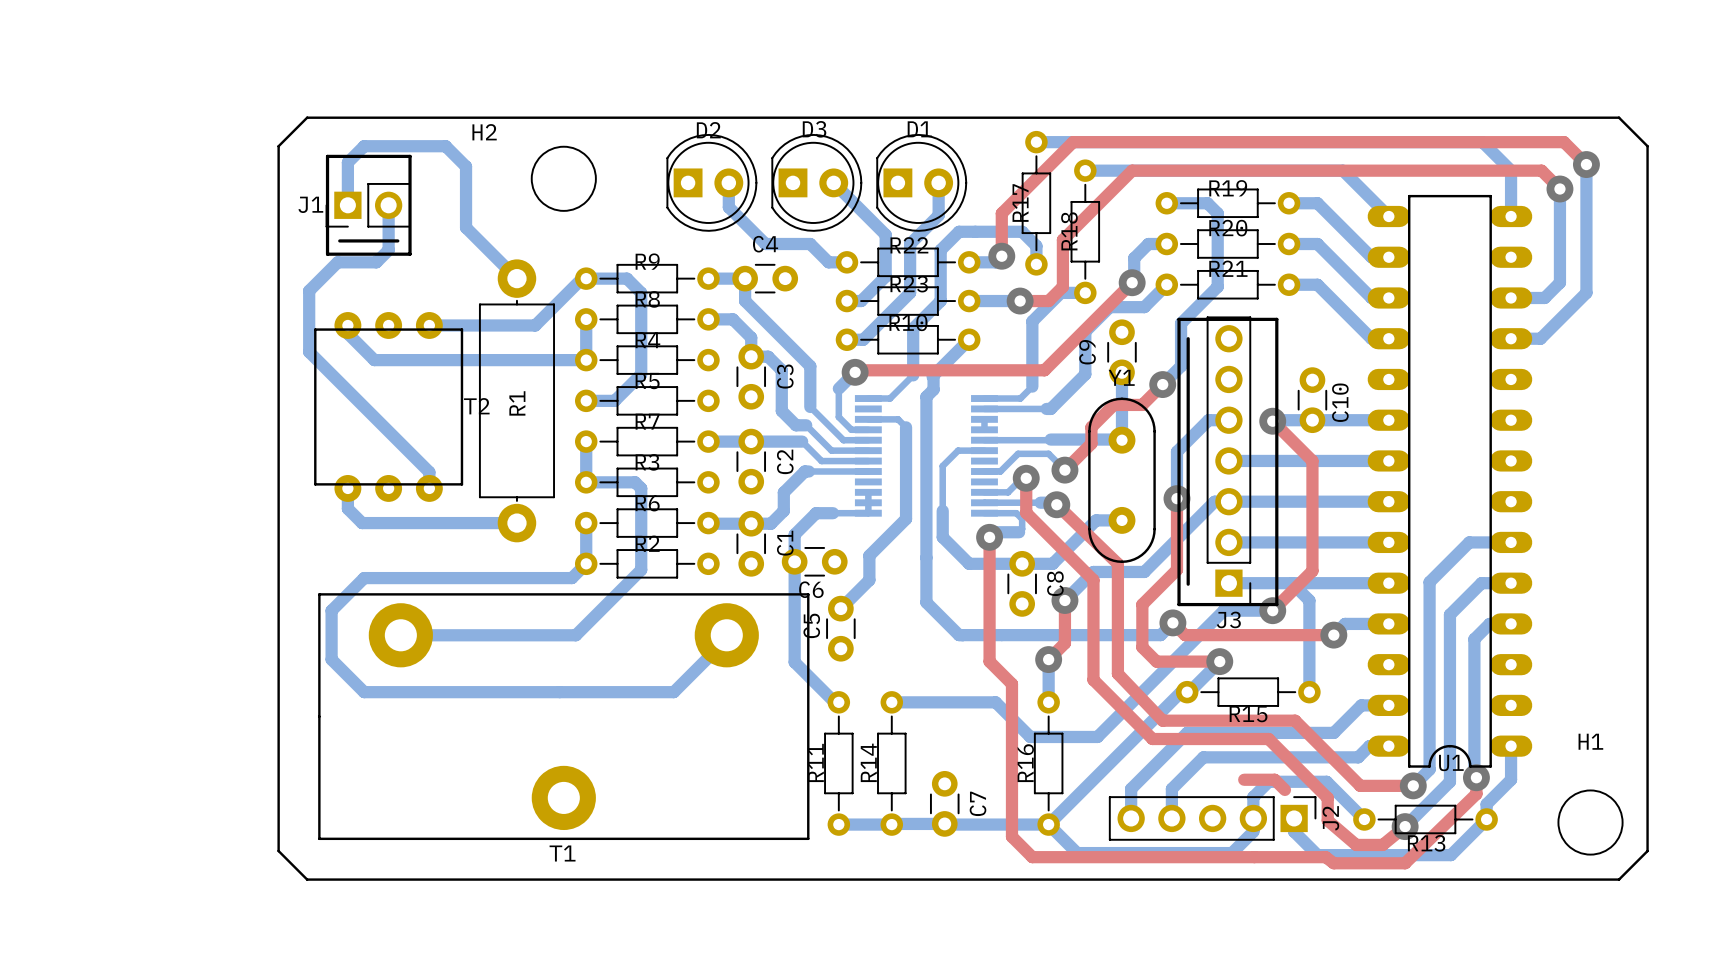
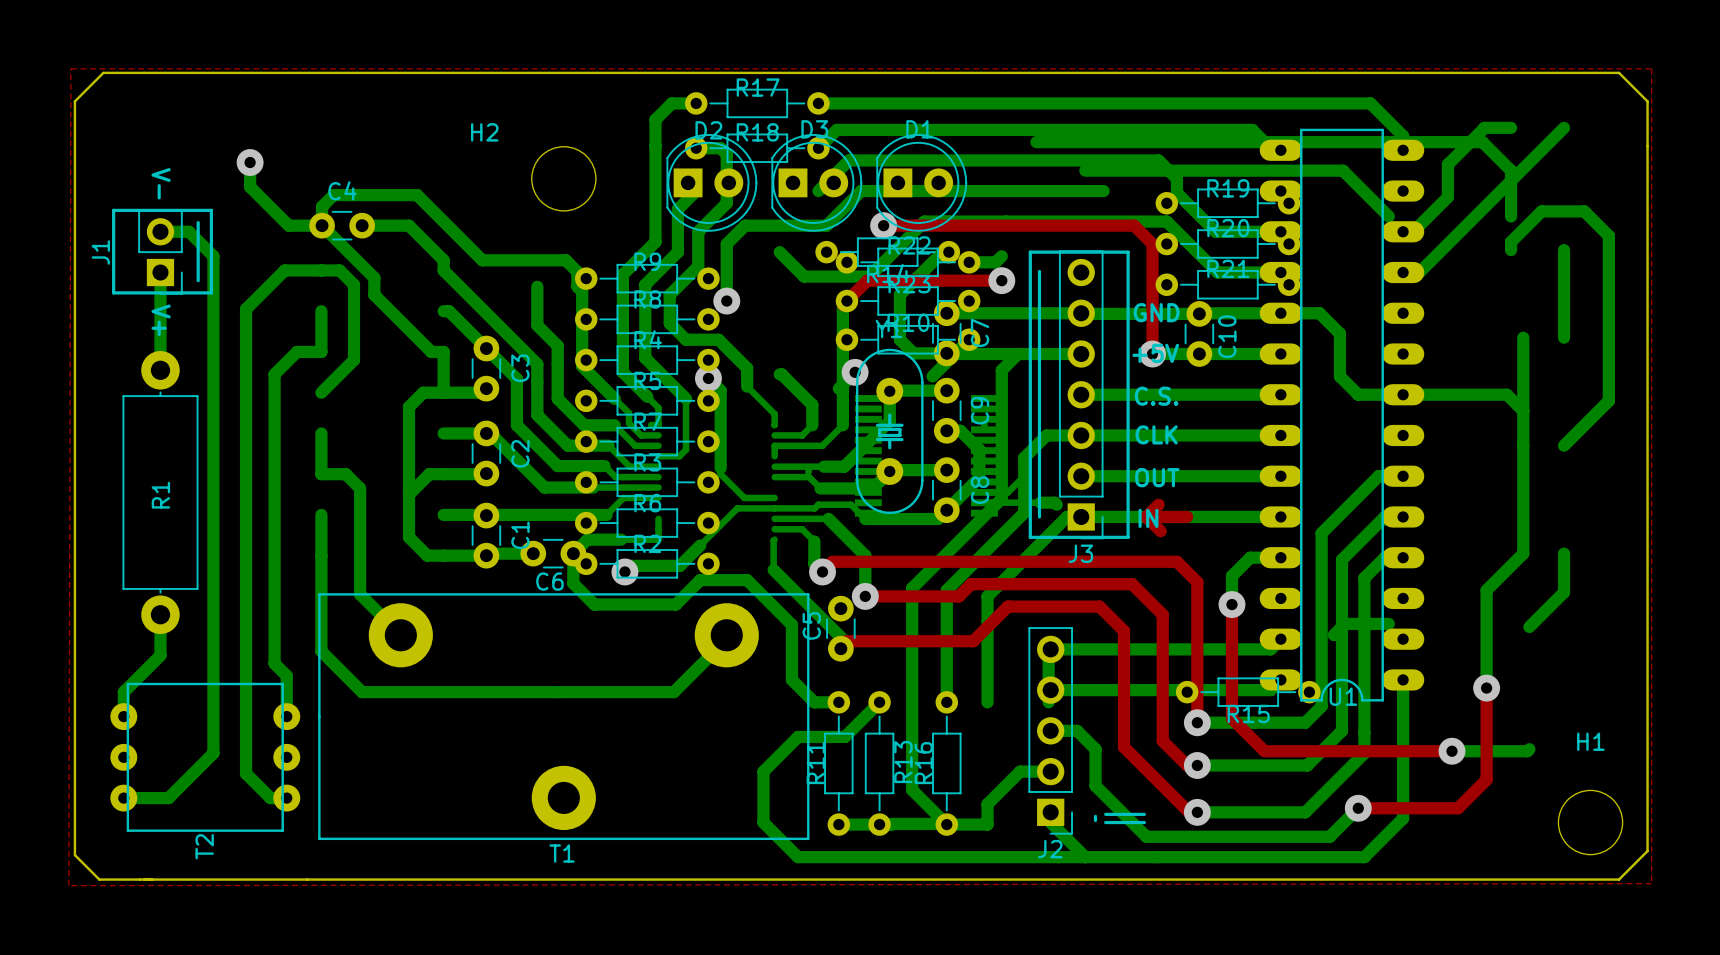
top zone outline: none -> (70, 68) (68, 885) (1651, 883) (1651, 68) (70, 68)
bottom track: none -> (696, 103) (671, 103) (655, 119) (655, 241) (622, 274) (622, 372) (658, 407) (658, 424) (651, 424)
bottom track: none -> (818, 103) (1370, 103) (1403, 136) (1403, 150)
bottom track: none -> (1511, 127) (1484, 127) (1447, 164) (1447, 197) (1413, 231) (1403, 231)
bottom track: none -> (1564, 127) (1419, 272) (1403, 272)
board edge: (1647, 146) (1619, 117) (307, 117) (278, 146) (278, 851) (307, 879) -> (1647, 146) (1647, 101) (1619, 72) (103, 72) (74, 101) (74, 855) (99, 879) (307, 879)
bottom track: none -> (696, 148) (720, 148) (726, 154) (726, 203) (698, 231) (698, 266) (669, 294) (669, 323) (686, 339) (718, 339) (747, 368) (747, 386) (774, 414) (774, 425)
bottom track: none -> (818, 148) (836, 129) (1252, 129) (1272, 150) (1280, 150)
line: (327, 156) (410, 156) (410, 254) (327, 254) (327, 156) -> none
bottom track: none -> (250, 162) (250, 186) (288, 225) (322, 225)
via: none -> (250, 162)
top track: (1586, 164) (1564, 142) (1073, 142) (1001, 213) (1001, 256) -> none
bottom track: (1586, 164) (1586, 292) (1540, 338) (1511, 338) -> none
via: (1586, 164) -> none
bottom track: (728, 182) (728, 207) (765, 244) (810, 244) (828, 262) (846, 262) -> none
bottom track: (833, 182) (885, 234) (885, 276) (861, 301) (846, 301) -> none
bottom track: (938, 182) (938, 215) (910, 244) (910, 292) (863, 339) (846, 339) -> none
text: none -> V- (161, 183)
top track: (1559, 189) (1541, 170) (1132, 170) (1062, 239) (1062, 286) (1048, 301) (1020, 301) -> none
bottom track: (1559, 189) (1559, 282) (1544, 297) (1511, 297) -> none
via: (1559, 189) -> none
bottom track: none -> (696, 191) (677, 209) (677, 252) (645, 284) (645, 358) (686, 398) (686, 449) (679, 456) (658, 456)
bottom track: none -> (818, 191) (849, 160) (1158, 160) (1176, 178) (1176, 193) (1215, 231) (1280, 231)
bottom track: none -> (1103, 191) (861, 191) (826, 225) (745, 225) (726, 244) (726, 301)
R17 rotation: 0° (1036, 203) -> 90° clockwise (757, 103)
R17 position: (1036, 203) -> (757, 103)
bottom track: (1166, 203) (1207, 203) (1217, 213) (1217, 286) (1181, 323) (1181, 366) (1162, 384) -> none
bottom track: (1289, 203) (1317, 203) (1371, 257) (1388, 257) -> none
bottom track: (347, 205) (347, 162) (364, 146) (445, 146) (466, 166) (466, 227) (516, 278) -> none
J1 rotation: 0° (368, 205) -> 90° counterclockwise (160, 252)
J1 position: (368, 205) -> (160, 252)
bottom track: (388, 205) (388, 250) (376, 262) (337, 262) (309, 290) (309, 351) (429, 472) (429, 488) -> none
line: none -> (113, 210) (211, 210) (211, 292) (113, 292) (113, 210)
line: none -> (198, 222) (198, 280)
bottom track: none -> (322, 225) (322, 206) (333, 195) (417, 195) (482, 260) (565, 260) (577, 271) (577, 286) (582, 291) (582, 366) (629, 413) (629, 423) (641, 435) (658, 435)
bottom track: none -> (322, 225) (374, 277) (374, 294) (431, 351) (443, 351) (443, 392)
bottom track: none -> (362, 225) (409, 225) (443, 260) (443, 270) (537, 364) (537, 415) (567, 445) (608, 445) (629, 466) (658, 466)
top track: none -> (883, 225) (1134, 225) (1152, 244) (1152, 354)
via: none -> (883, 225)
bottom track: none -> (160, 231) (189, 231) (213, 256) (213, 753) (168, 798) (123, 798)
R18 rotation: 0° (1085, 231) -> 90° clockwise (757, 148)
R18 position: (1085, 231) -> (757, 148)
line: (339, 240) (397, 240) -> none
bottom track: (1166, 244) (1148, 244) (1134, 258) (1134, 280) (1132, 282) -> none
bottom track: (1289, 244) (1317, 244) (1371, 297) (1388, 297) -> none
bottom track: none -> (1511, 250) (1511, 241) (1541, 211) (1584, 211) (1608, 235) (1608, 400) (1564, 445)
bottom track: none -> (1564, 250) (1564, 337)
bottom track: none -> (779, 252) (804, 276) (869, 276) (924, 221) (1166, 221) (1217, 272) (1280, 272)
bottom track: none -> (948, 252) (942, 252) (899, 294) (899, 339) (913, 353) (1081, 354)
via: (1001, 256) -> none
bottom track: (1036, 264) (1036, 246) (1022, 231) (959, 231) (940, 250) (940, 301) (913, 328) (913, 375) -> none
bottom track: none -> (160, 272) (160, 370)
bottom track: (708, 278) (745, 278) (745, 301) (810, 366) (810, 406) (843, 440) (868, 440) -> none
C4 position: (765, 278) -> (342, 225)
top track: none -> (1001, 280) (867, 280) (842, 305)
via: none -> (1001, 280)
top track: (1132, 282) (1044, 370) (857, 370) (855, 372) -> none
via: (1132, 282) -> none
bottom track: (1166, 284) (1144, 307) (1109, 307) (1085, 331) (1085, 374) (1050, 408) (984, 408) -> none
bottom track: (1289, 284) (1317, 284) (1371, 338) (1388, 338) -> none
bottom track: none -> (537, 286) (537, 325) (557, 345) (557, 398) (584, 425) (614, 425) (635, 445) (658, 445)
bottom track: (1085, 292) (1060, 292) (1032, 321) (1032, 386) (1020, 398) (984, 398) -> none
via: none -> (726, 301)
bottom track: (969, 301) (1020, 301) -> none
via: (1020, 301) -> none
bottom track: none -> (842, 305) (842, 425) (822, 445) (774, 445) (774, 456)
bottom track: none -> (321, 311) (321, 351) (296, 351) (274, 374) (274, 663) (286, 675) (286, 716)
bottom track: none -> (443, 311) (449, 311) (516, 379) (516, 425) (557, 466) (604, 466) (615, 477) (658, 477)
text: none -> GND (1156, 312)
bottom track: none -> (946, 313) (1319, 313) (1339, 333) (1339, 376) (1358, 394) (1506, 394) (1523, 411)
bottom track: (586, 319) (586, 360) (374, 360) (347, 333) (347, 325) -> none
bottom track: (708, 319) (732, 319) (751, 337) (751, 356) (768, 356) (781, 370) (781, 411) (796, 425) (806, 425) (831, 450) (868, 450) -> none
line: (1179, 319) (1276, 319) (1276, 604) (1179, 604) (1179, 319) -> (1030, 252) (1128, 252) (1128, 537) (1030, 537) (1030, 252)
text: none -> V+ (161, 320)
bottom track: (429, 325) (535, 325) (582, 278) (626, 278) (641, 292) (641, 374) (614, 400) (586, 400) -> none
bottom track: none -> (1523, 337) (1523, 553) (1486, 590) (1486, 688)
line: (1188, 338) (1188, 584) -> (1039, 271) (1039, 516)
C9 name position: C9 (1087, 352) -> C9 (980, 410)
C9 position: (1121, 352) -> (946, 410)
text: none -> +5V (1155, 353)
bottom track: none -> (1018, 354) (1001, 370) (1001, 498) (912, 588) (912, 789) (946, 824)
bottom track: none -> (1152, 354) (1280, 354)
bottom track: (1121, 372) (1121, 440) (984, 440) -> none
bottom track: none -> (779, 374) (812, 404) (812, 425) (802, 435) (774, 435)
bottom track: (914, 374) (890, 398) (868, 398) -> none
bottom track: (933, 375) (933, 389) (926, 396) (926, 602) (959, 635) (1160, 635) (1172, 622) -> none
C3 position: (751, 376) -> (486, 368)
bottom track: none -> (708, 378) (720, 390) (720, 474) (744, 497) (774, 497)
via: none -> (708, 378)
top track: (1162, 384) (1142, 404) (1113, 404) (1091, 427) (1091, 443) (1064, 470) -> none
via position: (1162, 384) -> (1152, 354)
bottom track: (838, 386) (838, 417) (851, 429) (868, 429) -> none
bottom track: none -> (486, 388) (482, 392) (423, 392) (409, 406) (409, 537) (427, 555) (533, 553)
bottom track: none -> (946, 390) (890, 390) (889, 421) (844, 466) (774, 466)
bottom track: none -> (321, 392) (354, 360) (354, 284) (339, 270) (284, 270) (246, 309) (246, 773) (270, 798) (286, 798)
bottom track: none -> (1081, 394) (1280, 394)
text: none -> C.S. (1156, 396)
R1 position: (516, 400) -> (160, 492)
C10 position: (1312, 400) -> (1199, 333)
T2 rotation: 0° (388, 406) -> 90° clockwise (205, 757)
T2 position: (388, 406) -> (205, 757)
line: none -> (889, 415) (889, 425)
bottom track: (868, 419) (898, 419) (906, 427) (906, 519) (869, 555) (869, 580) (840, 608) -> none
bottom track: (1228, 420) (1208, 420) (1176, 451) (1176, 498) -> none
bottom track: (1388, 420) (1272, 421) -> none
top track: (1272, 421) (1312, 460) (1312, 570) (1272, 610) -> none
via: (1272, 421) -> none
line: none -> (877, 425) (901, 425)
line: none -> (879, 429) (899, 429) (899, 435) (879, 435) (879, 429)
bottom track: none -> (946, 430) (960, 430) (979, 449) (979, 477) (938, 519) (865, 519) (851, 504) (818, 504) (814, 508) (737, 508) (679, 565) (631, 565) (624, 571)
bottom track: none -> (443, 433) (490, 433) (544, 487) (658, 487)
text: none -> CLK (1156, 434)
bottom track: none -> (1280, 435) (1046, 435) (1024, 457) (1024, 512) (946, 590) (946, 702)
line: none -> (877, 439) (901, 439)
line: none -> (889, 439) (889, 447)
bottom track: (586, 441) (586, 482) (635, 482) (641, 488) (641, 569) (575, 635) (400, 635) -> (321, 433) (321, 474) (345, 474) (360, 488) (360, 594) (400, 635)
bottom track: (708, 441) (802, 441) (821, 461) (868, 461) -> none
bottom track: (984, 450) (958, 450) (942, 466) (942, 537) (969, 563) (1052, 563) (1096, 520) (1123, 521) -> none
bottom track: (1228, 460) (1388, 460) -> none
J3 position: (1228, 460) -> (1081, 394)
C2 position: (751, 461) -> (486, 453)
bottom track: none -> (946, 470) (891, 470) (872, 488) (820, 488) (809, 477) (774, 477)
bottom track: (1064, 470) (1048, 453) (1018, 453) (1000, 471) (984, 471) -> none
via: (1064, 470) -> none
bottom track: (868, 471) (804, 471) (783, 492) (783, 510) (770, 523) (708, 523) -> none
bottom track: none -> (486, 473) (429, 474) (409, 494)
bottom track: none -> (1081, 476) (1280, 476)
bottom track: none -> (1403, 476) (1378, 476) (1321, 533) (1321, 706) (1305, 722) (1197, 722)
text: none -> OUT (1157, 477)
top track: (1026, 478) (1026, 512) (1093, 580) (1093, 679) (1152, 739) (1268, 739) (1327, 798) (1327, 820) (1356, 844) (1382, 844) (1405, 826) -> none
via: (1026, 478) -> none
Y1 position: (1121, 480) -> (889, 431)
U1 position: (1449, 481) -> (1341, 415)
bottom track: (347, 488) (347, 508) (362, 523) (516, 523) -> none
bottom track: (868, 492) (868, 513) (816, 513) (794, 534) (794, 662) (834, 702) -> (658, 518) (658, 539) (587, 539) (573, 553) (573, 583) (594, 604) (675, 604) (700, 580) (747, 580) (791, 624) (791, 679) (814, 702) (834, 702)
bottom track: none -> (658, 497) (623, 497) (606, 514) (443, 514)
top track: (1176, 498) (1176, 569) (1142, 604) (1142, 647) (1156, 661) (1219, 661) -> none
via: (1176, 498) -> none
bottom track: (1388, 501) (1214, 501) (1144, 571) (1093, 571) (1064, 600) -> none
top track: (1056, 504) (1117, 563) (1117, 673) (1162, 720) (1295, 720) (1360, 785) (1413, 785) -> none
via: (1056, 504) -> none
top track: none -> (1158, 504) (1146, 516)
bottom track: (984, 513) (1016, 513) (1022, 519) (1022, 529) (1018, 533) -> none
top track: none -> (1146, 516) (1160, 531)
top track: none -> (1146, 516) (1187, 516)
bottom track: none -> (1280, 516) (1066, 516) (987, 596) (987, 702)
bottom track: none -> (1403, 516) (1384, 516) (1341, 559) (1341, 730) (1307, 765) (1197, 765)
bottom track: none -> (774, 518) (828, 518) (865, 555) (865, 596)
text: none -> IN (1148, 518)
bottom track: (586, 523) (586, 563) (571, 578) (364, 578) (331, 610) (331, 659) (364, 692) -> (321, 514) (321, 651) (364, 692)
bottom track: none -> (774, 529) (802, 529) (814, 541) (814, 563) (822, 571)
bottom track: (1019, 532) (994, 532) (989, 537) -> none
top track: (989, 537) (989, 661) (1011, 684) (1011, 836) (1032, 857) (1325, 857) (1333, 863) (1405, 863) (1476, 794) (1476, 777) -> none
via: (989, 537) -> none
bottom track: none -> (774, 539) (773, 569) (844, 641)
bottom track: (1228, 542) (1388, 542) -> none
bottom track: (1511, 542) (1469, 542) (1429, 582) (1429, 769) (1413, 785) -> none
C1 position: (751, 543) -> (486, 535)
bottom track: none -> (1564, 553) (1564, 592) (1529, 626)
bottom track: none -> (1280, 557) (1250, 557) (1231, 576) (1231, 604)
bottom track: none -> (1403, 557) (1384, 557) (1364, 578) (1364, 753) (1305, 812) (1197, 812)
C6 position: (814, 561) -> (553, 553)
via: none -> (624, 571)
top track: none -> (822, 571) (832, 561) (1176, 561) (1197, 582) (1197, 722)
via: none -> (822, 571)
C8 position: (1022, 583) -> (946, 490)
bottom track: (1228, 583) (1388, 583) -> none
bottom track: (1292, 583) (1309, 600) (1309, 692) -> none
bottom track: (1511, 583) (1481, 583) (1449, 614) (1449, 781) (1405, 826) -> none
top track: none -> (865, 596) (959, 596) (971, 584) (1132, 584) (1162, 614) (1162, 741) (1187, 765) (1197, 765)
via: none -> (865, 596)
top track: (1064, 600) (1064, 643) (1048, 659) -> none
via: (1064, 600) -> none
top track: none -> (1231, 604) (1231, 718) (1264, 751) (1451, 751)
via: none -> (1231, 604)
bottom track: (1272, 610) (1223, 610) (1097, 736) (1030, 736) (995, 702) (891, 702) -> none
via: (1272, 610) -> none
bottom track: none -> (160, 614) (160, 655) (123, 692) (123, 716)
top track: (1172, 622) (1185, 635) (1335, 635) -> none
via: (1172, 622) -> none
bottom track: (1511, 623) (1489, 623) (1474, 639) (1474, 775) (1476, 777) -> none
via: (1333, 635) -> none
bottom track: none -> (1280, 639) (1270, 649) (1050, 649)
top track: none -> (844, 641) (973, 641) (1007, 606) (1099, 606) (1124, 631) (1124, 747) (1189, 812) (1197, 812)
via: (1048, 659) -> none
bottom track: (1219, 661) (1189, 692) (1181, 692) (1048, 824) -> none
via: (1219, 661) -> none
bottom track: none -> (1280, 679) (1270, 690) (1050, 690)
bottom track: none -> (1403, 679) (1403, 818) (1364, 857) (798, 857) (763, 822) (763, 771) (798, 736) (844, 736) (879, 702)
top track: none -> (1486, 688) (1486, 779) (1458, 808) (1358, 808)
via: none -> (1486, 688)
bottom track: (1388, 705) (1361, 705) (1333, 732) (1187, 732) (1131, 788) (1131, 818) -> none
via: none -> (1197, 722)
bottom track: none -> (1050, 730) (1077, 730) (1095, 749) (1095, 785) (1146, 836) (1329, 836) (1358, 808)
bottom track: (1388, 746) (1369, 746) (1358, 757) (1203, 757) (1171, 788) (1171, 818) -> none
bottom track: (1511, 746) (1511, 779) (1486, 804) (1486, 819) (1450, 855) (1317, 855) (1294, 831) (1294, 818) -> none
bottom track: none -> (1529, 749) (1527, 751) (1451, 751)
via: none -> (1451, 751)
R14 rotation: 0° (891, 763) -> 90° clockwise (887, 252)
R14 position: (891, 763) -> (887, 252)
R16 position: (1048, 763) -> (946, 763)
via: none -> (1197, 765)
via: (1476, 777) -> none
top track: (1244, 779) (1274, 779) (1284, 789) -> none
via: (1413, 785) -> none
C7 position: (944, 803) -> (946, 333)
via: none -> (1358, 808)
bottom track: none -> (1050, 812) (1050, 822) (1085, 857)
via: none -> (1197, 812)
line: none -> (1105, 814) (1144, 814)
line: none -> (1095, 816) (1095, 820)
J2 rotation: 0° (1212, 818) -> 90° clockwise (1050, 730)
J2 position: (1212, 818) -> (1050, 730)
bottom track: (1364, 819) (1326, 781) (1268, 781) (1253, 797) (1253, 831) (1231, 853) (1077, 853) (1048, 824) -> none
R13 rotation: 0° (1425, 819) -> 90° clockwise (879, 763)
R13 position: (1425, 819) -> (879, 763)
line: none -> (1105, 822) (1144, 822)
bottom track: (987, 824) (1048, 824) -> (987, 824) (987, 804) (1020, 771) (1050, 771)
via: (1405, 826) -> none
R13 name position: R13 (1426, 843) -> R13 (903, 762)

